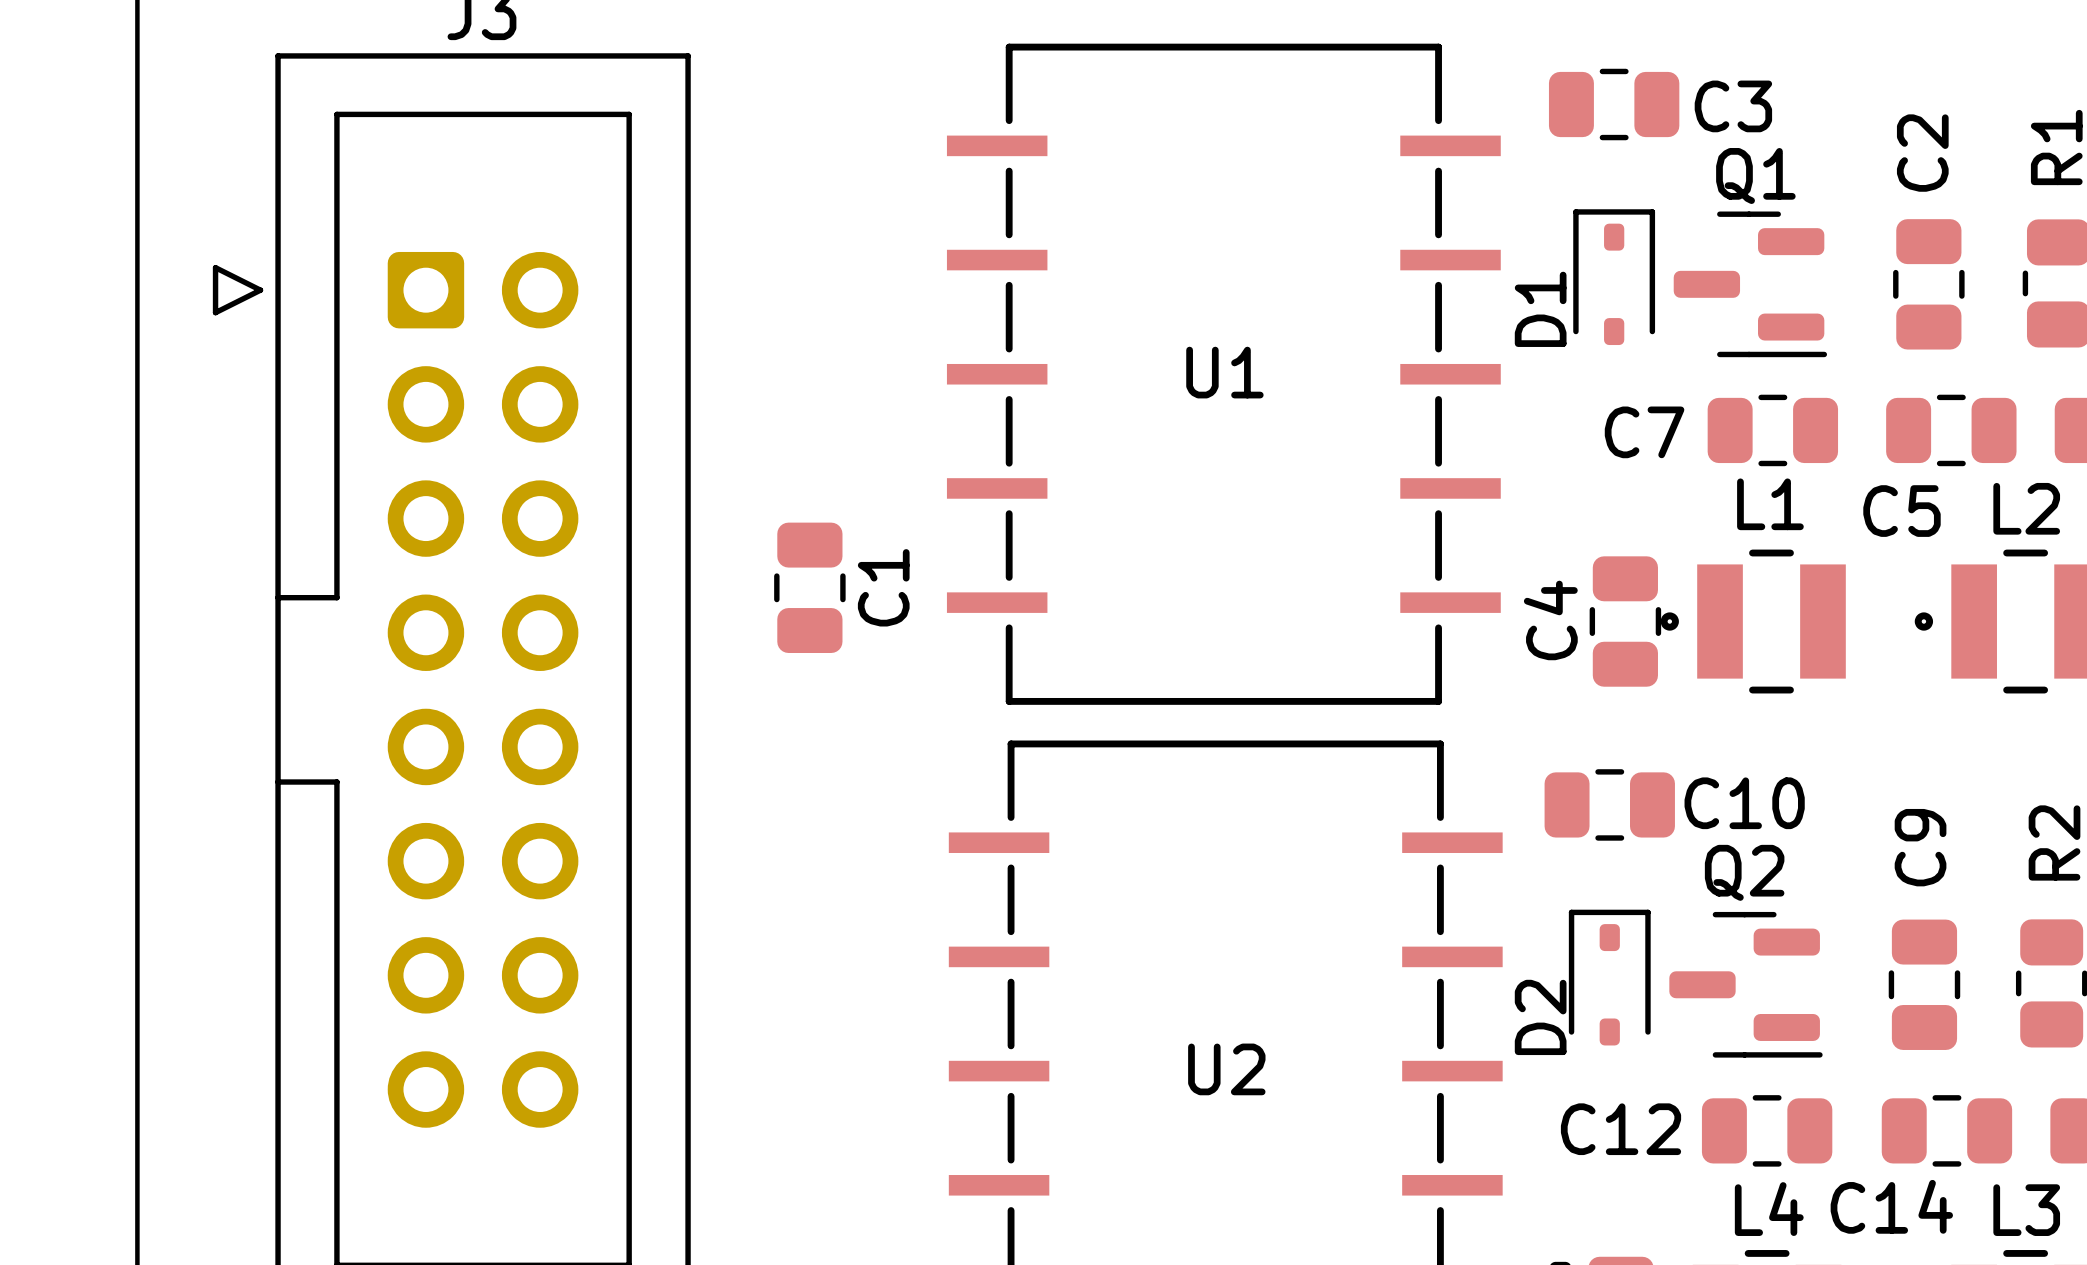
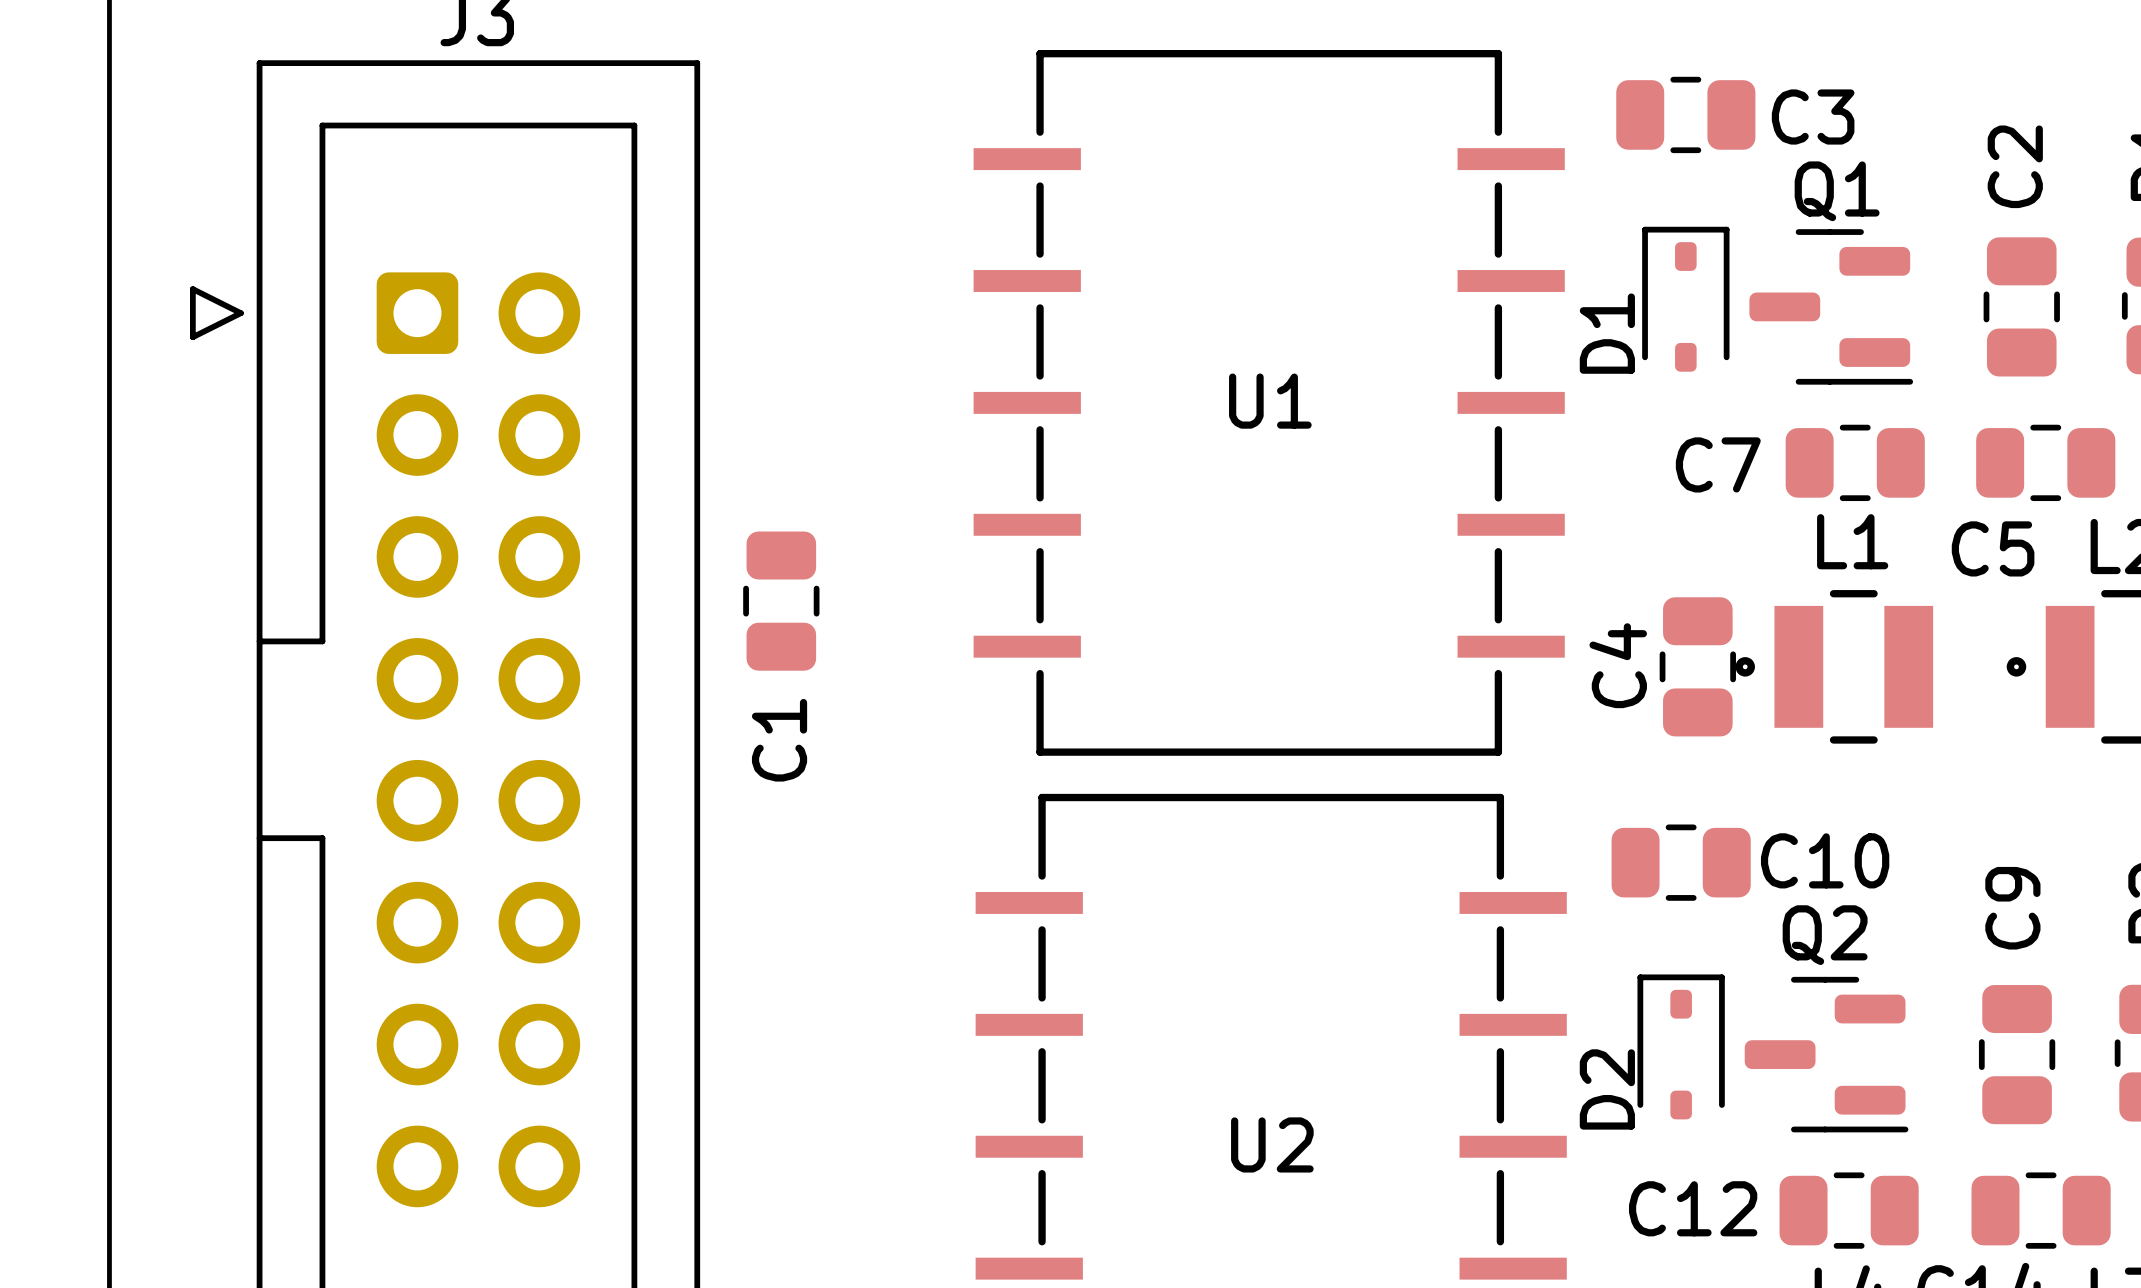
C1 position: (809, 587) -> (781, 601)
C1 name position: C1 (883, 587) -> C1 (779, 740)

